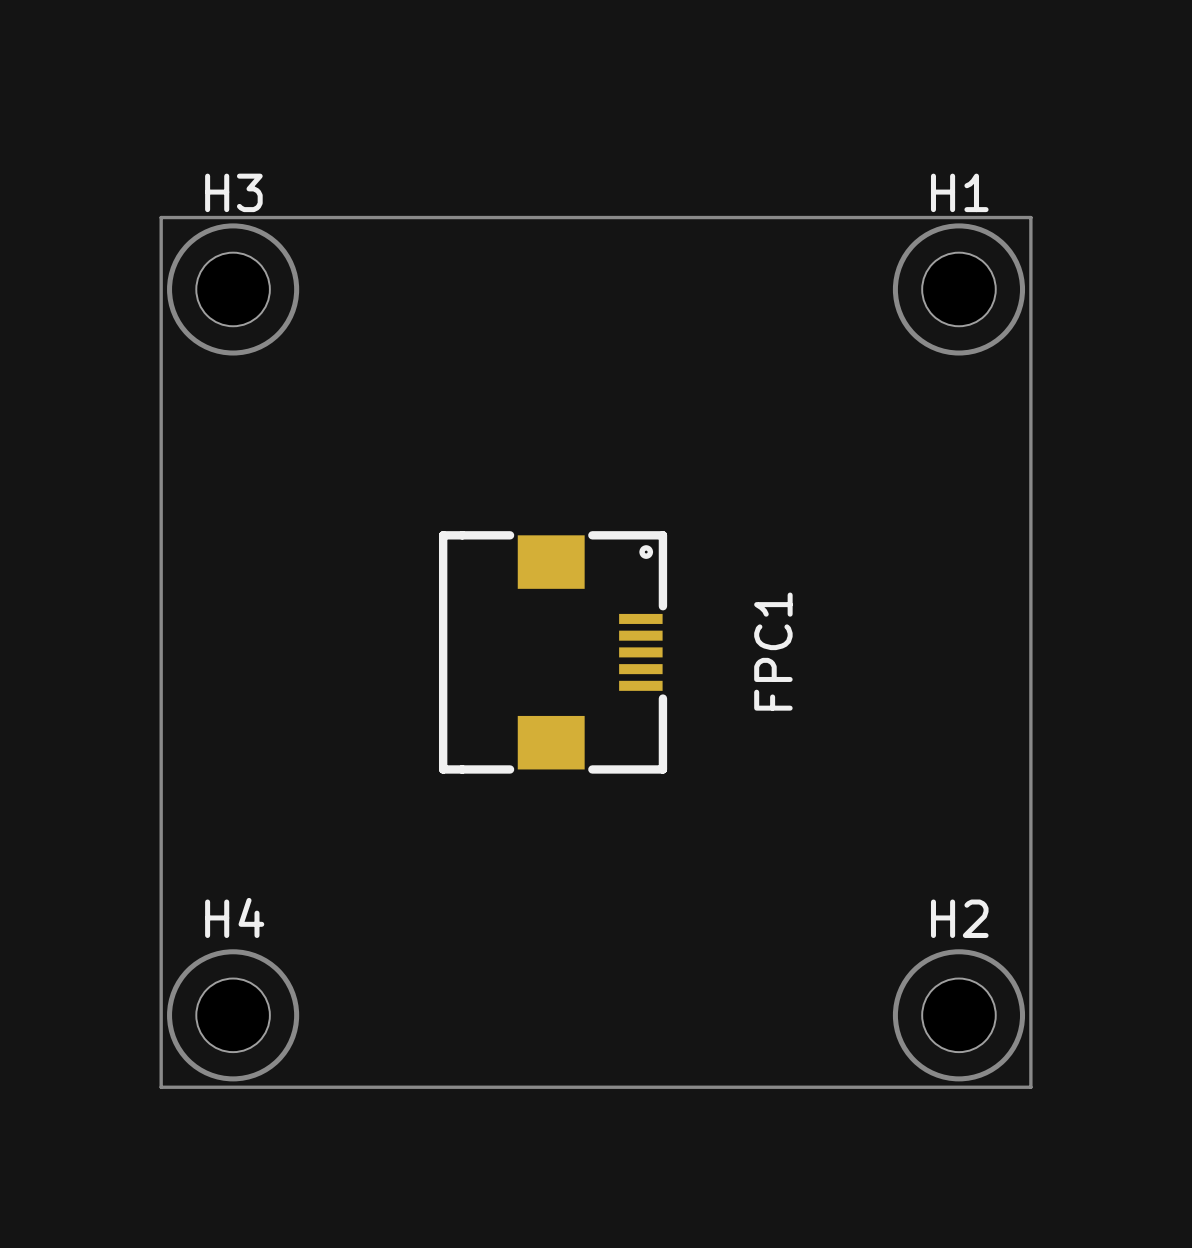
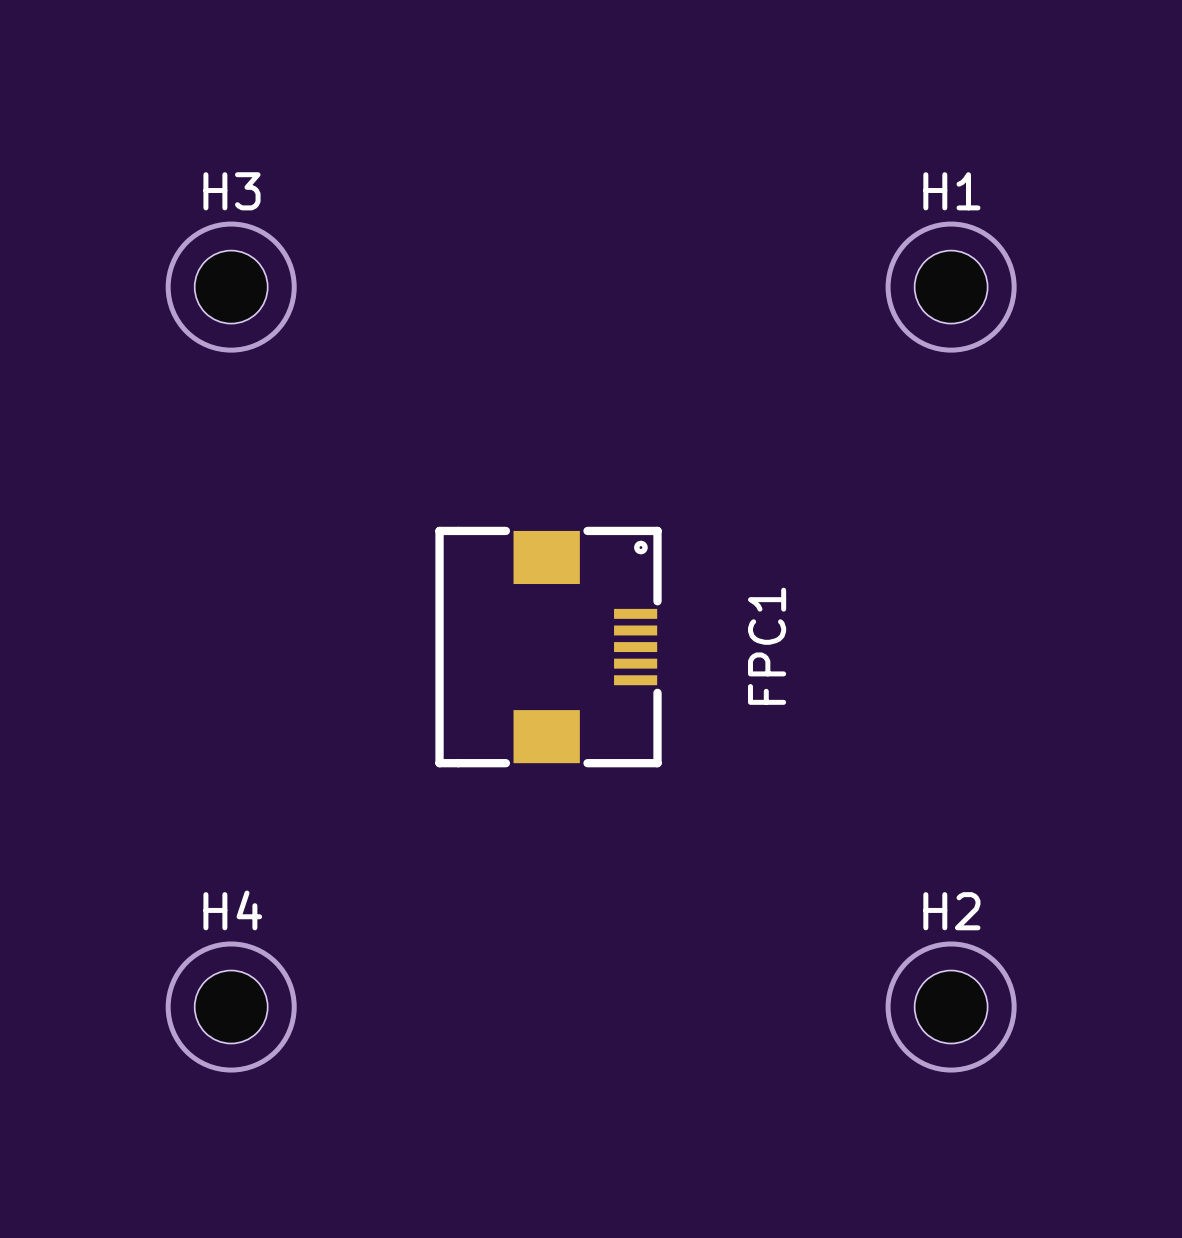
line: (161, 217) (161, 1087) (1030, 1087) (1030, 217) (161, 217) -> none

